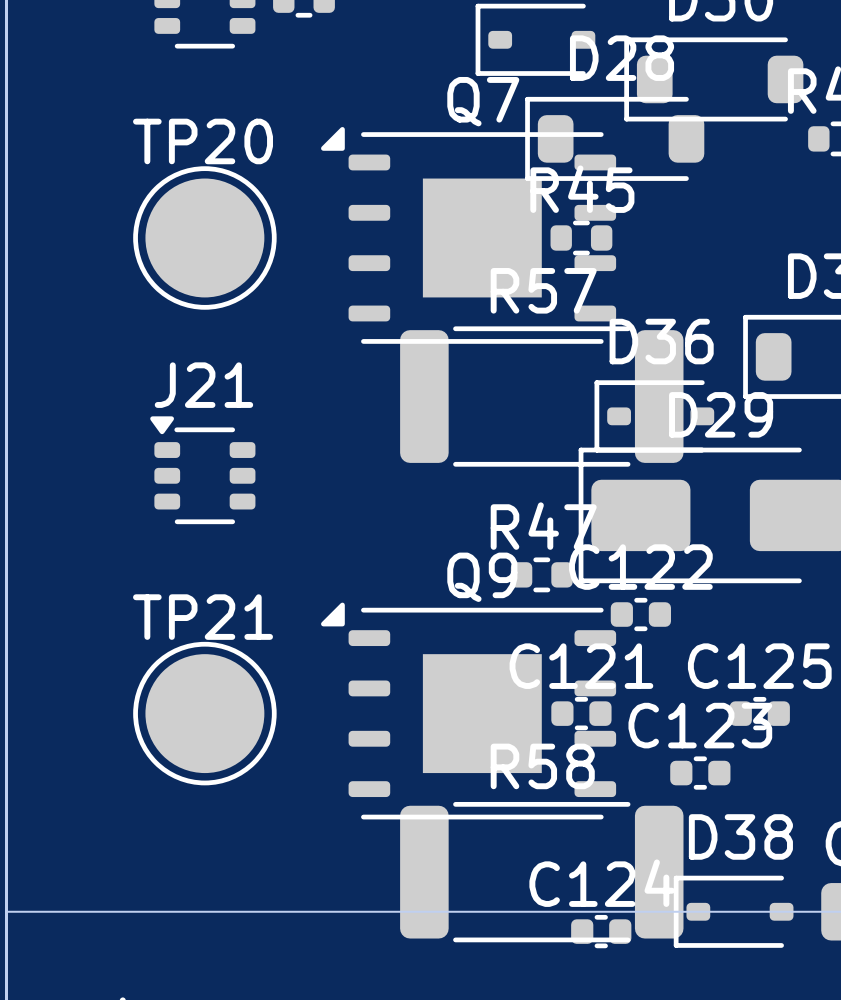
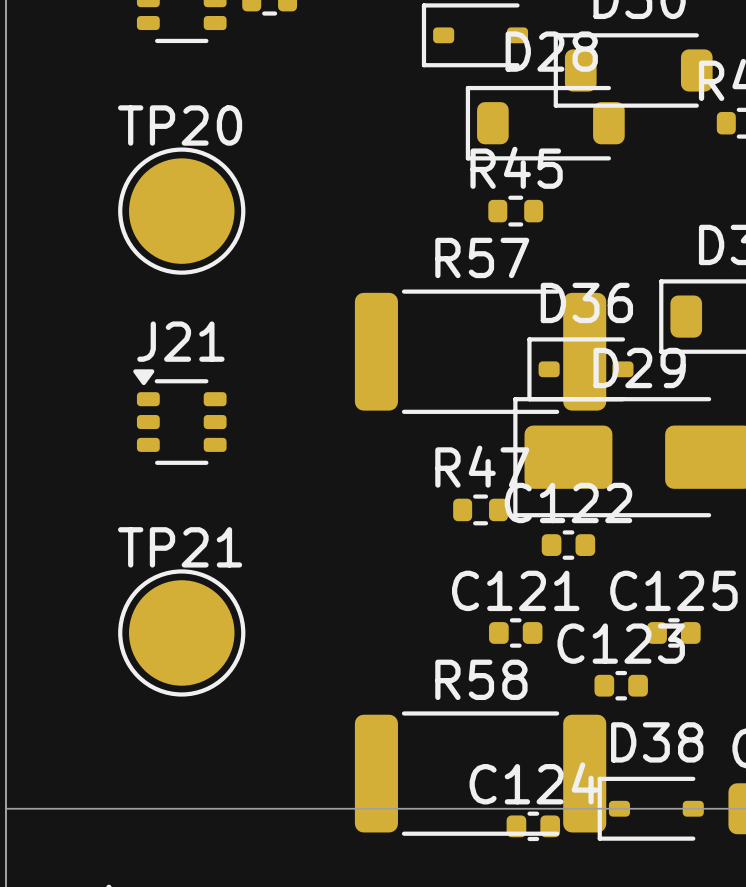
Q7: (468, 235) -> none
Q9: (468, 711) -> none

